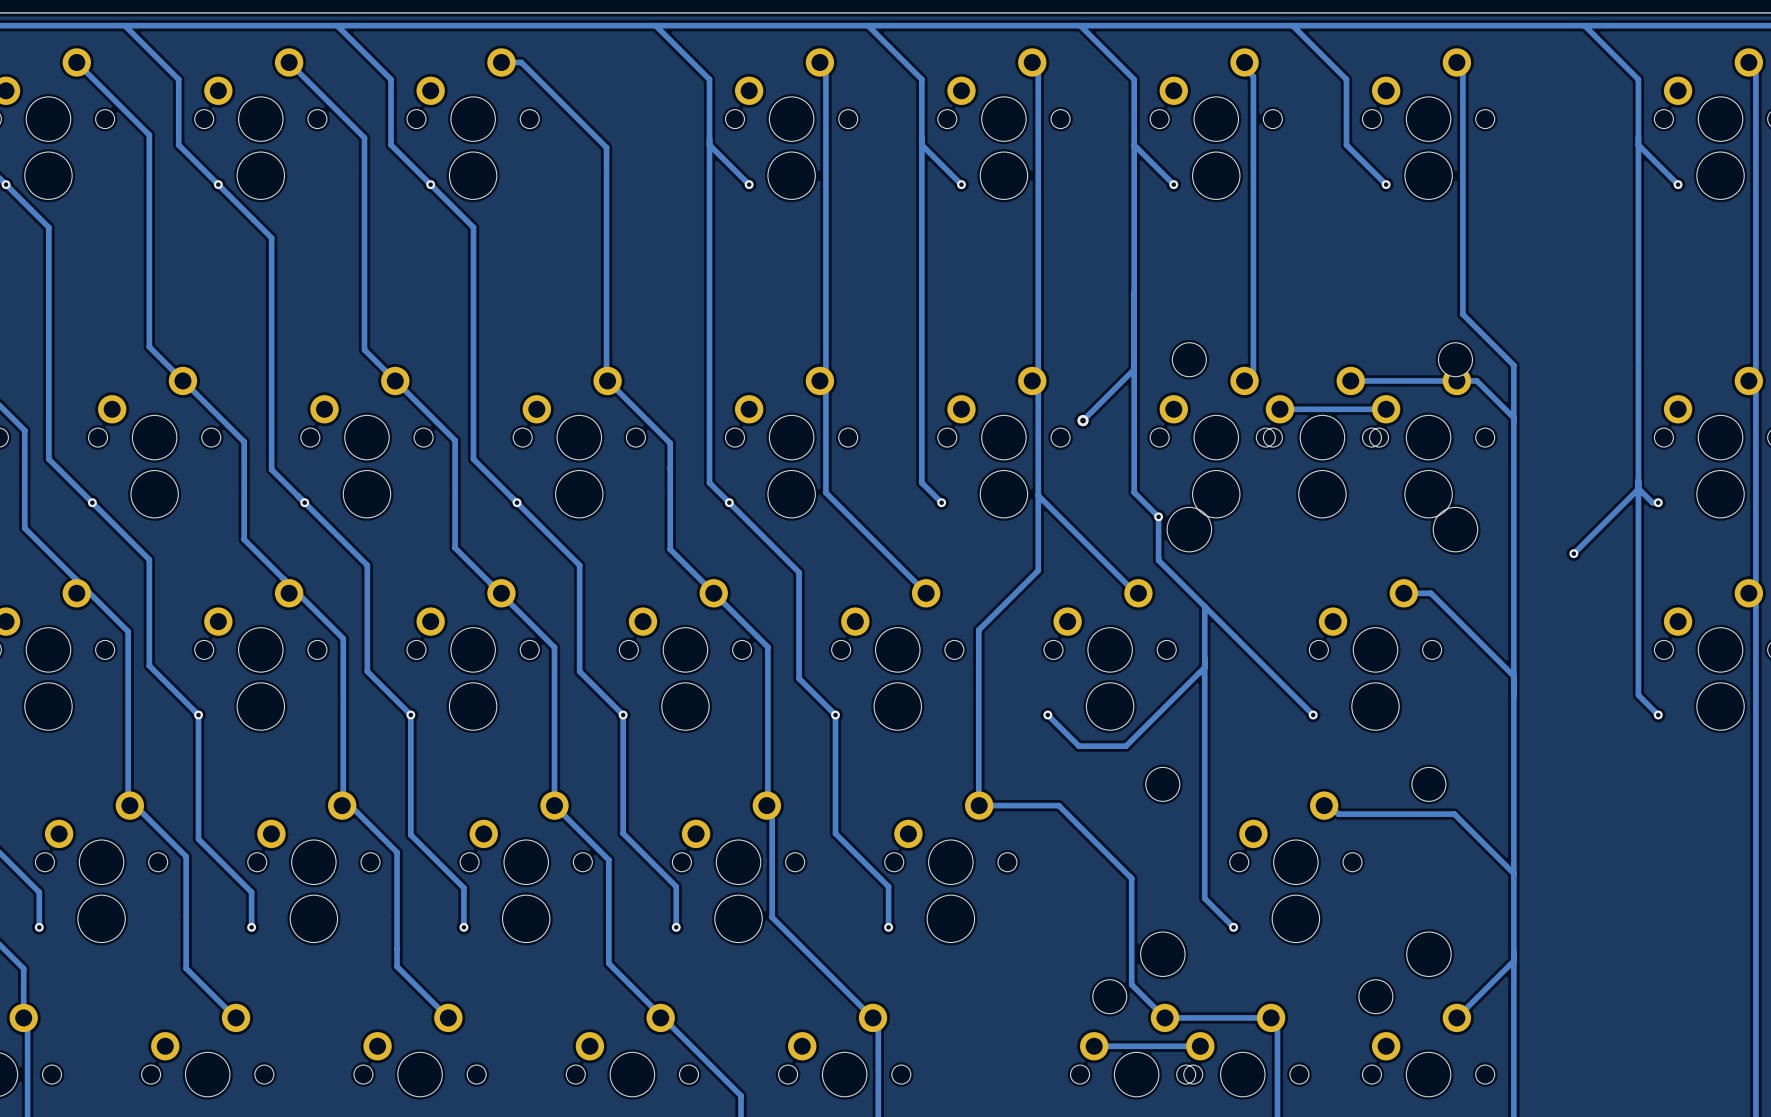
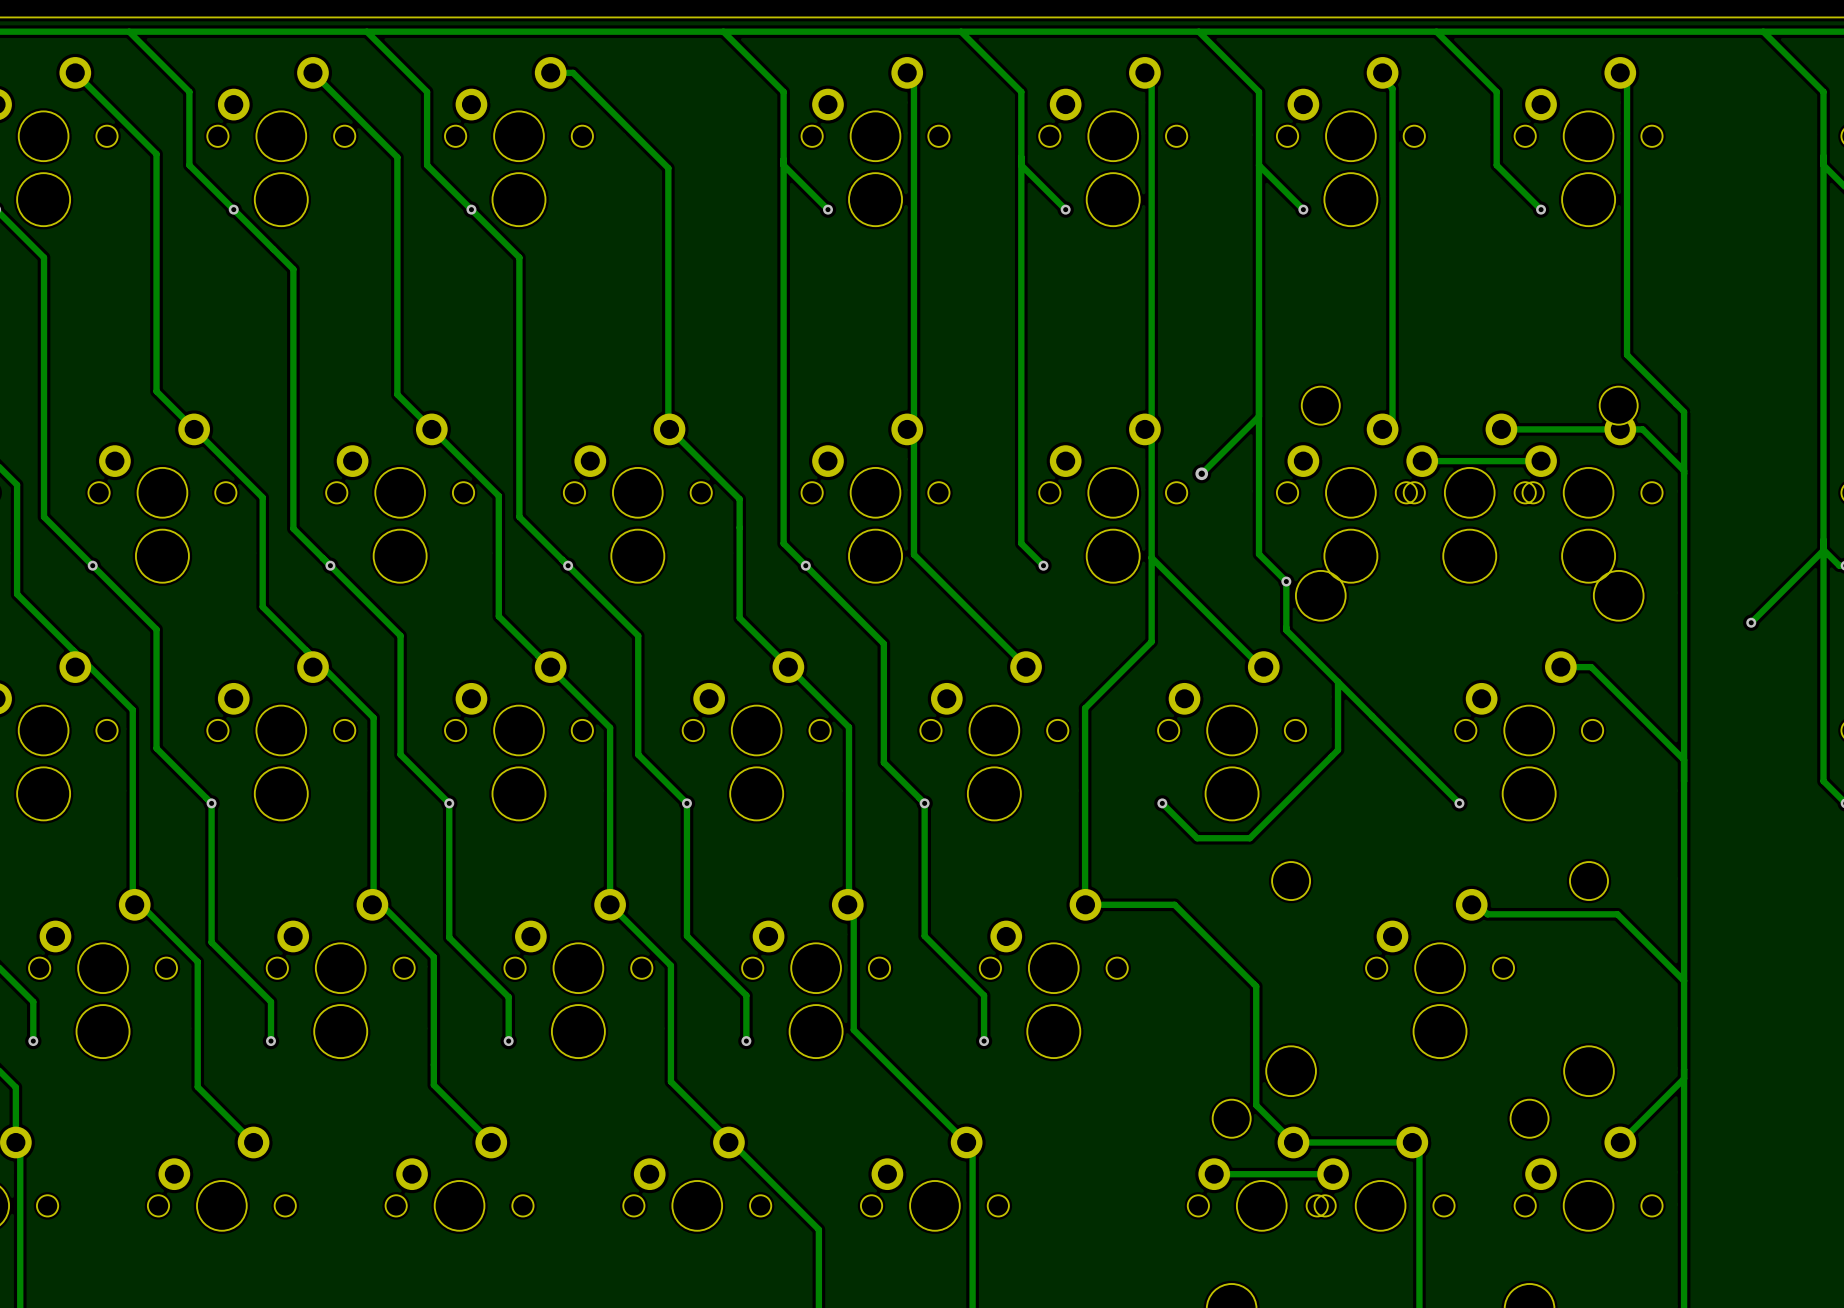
track: (1204, 667) (1204, 898) (1233, 927) -> none
via: (1233, 927) -> none

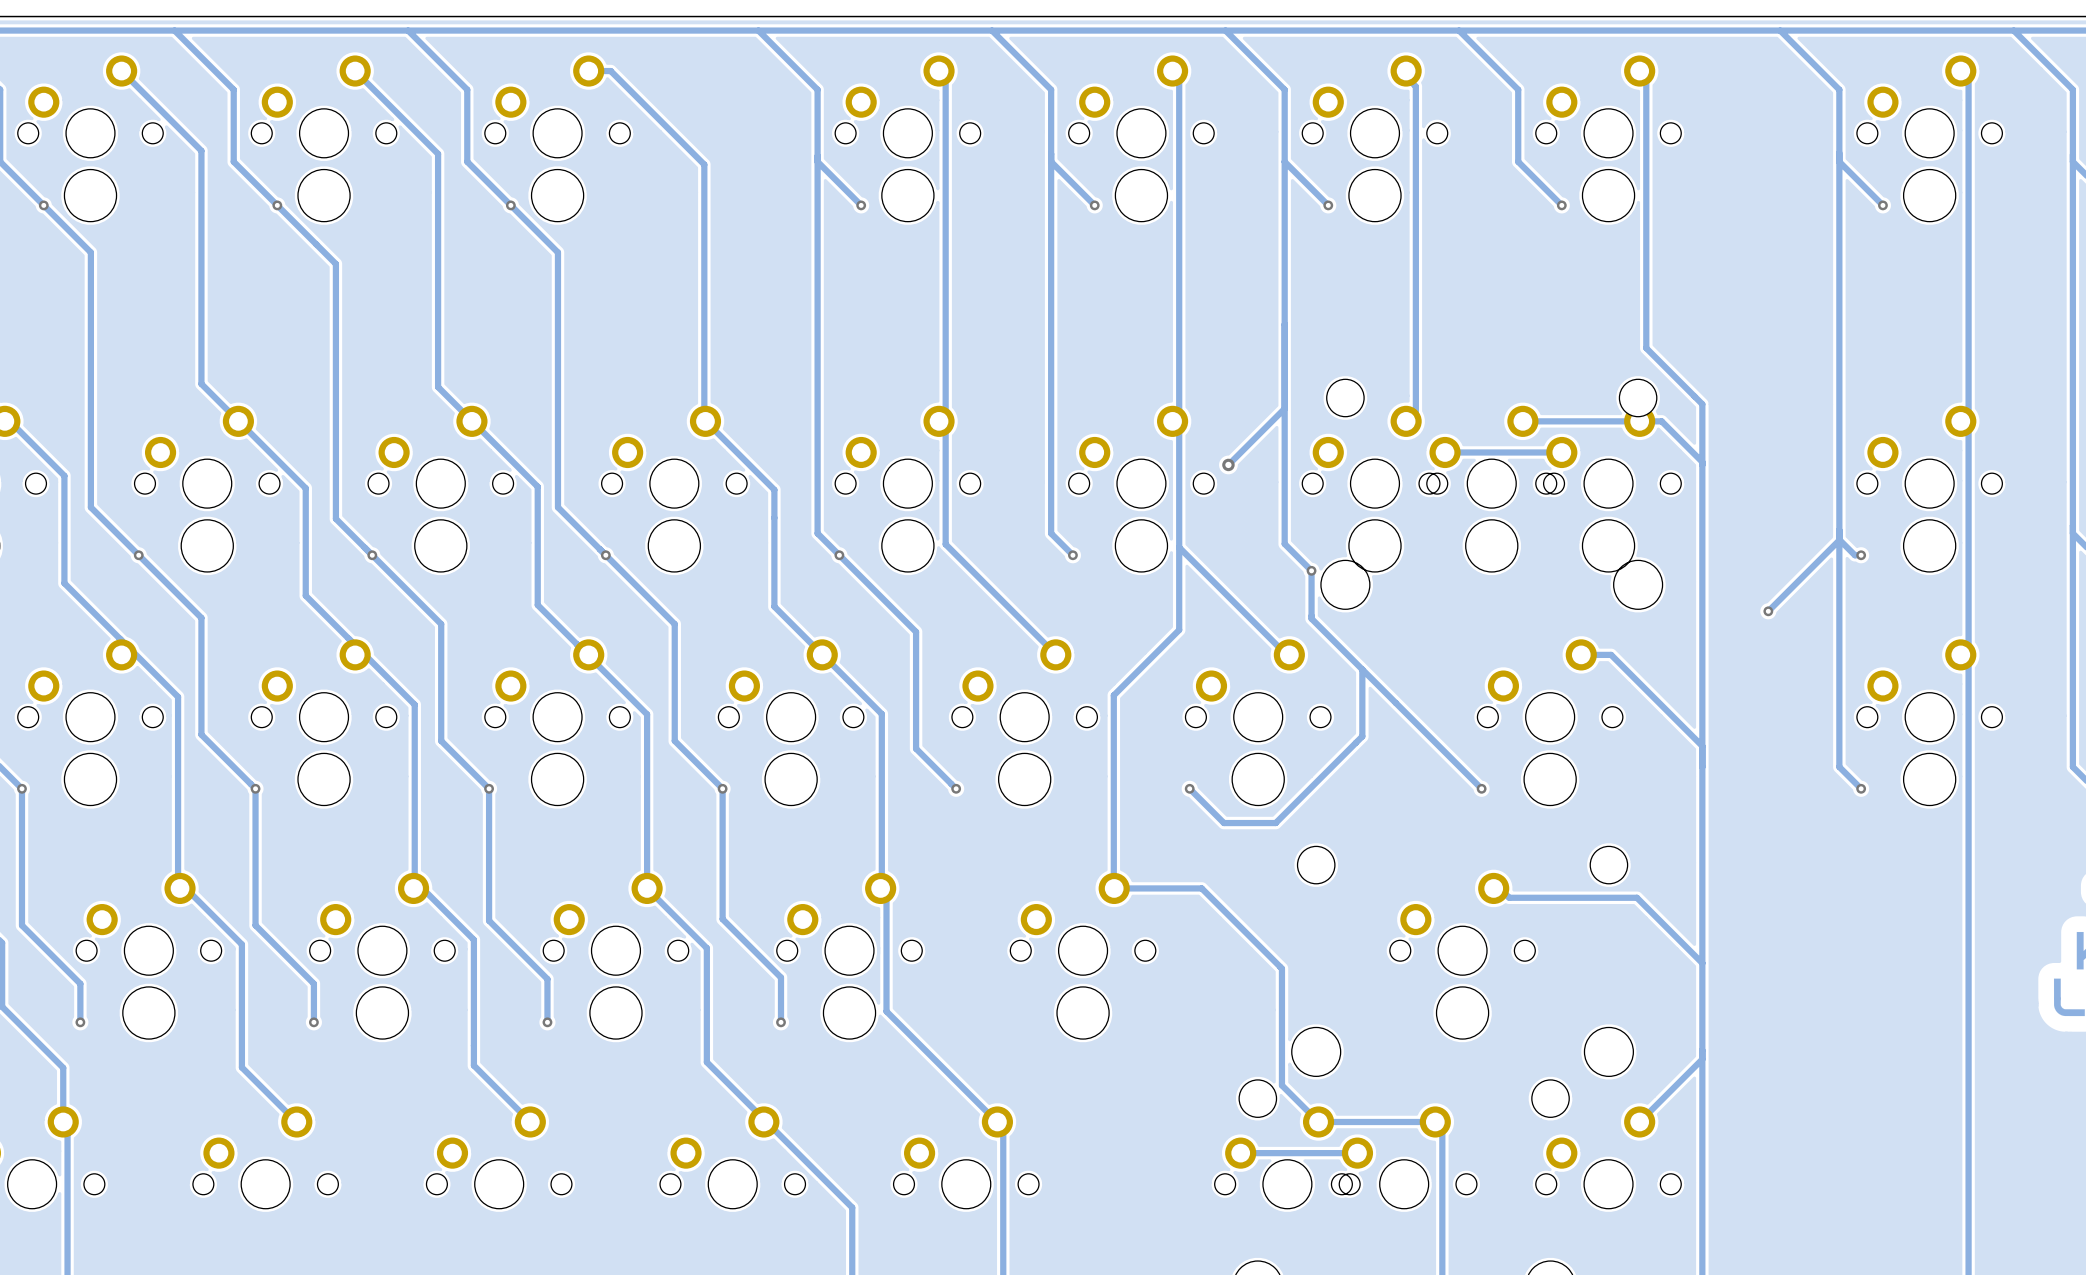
track: (924, 803) (924, 936) (984, 995) (984, 1041) -> none
via: (984, 1041) -> none

